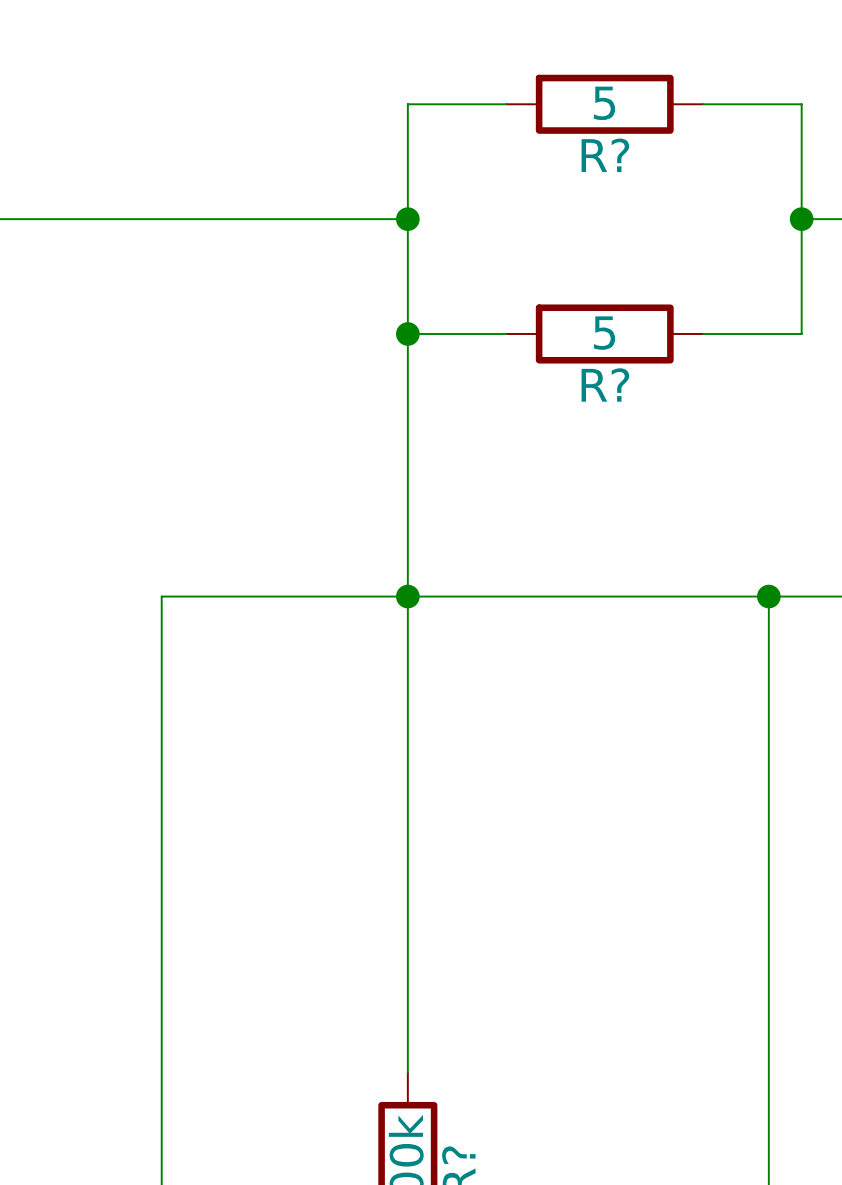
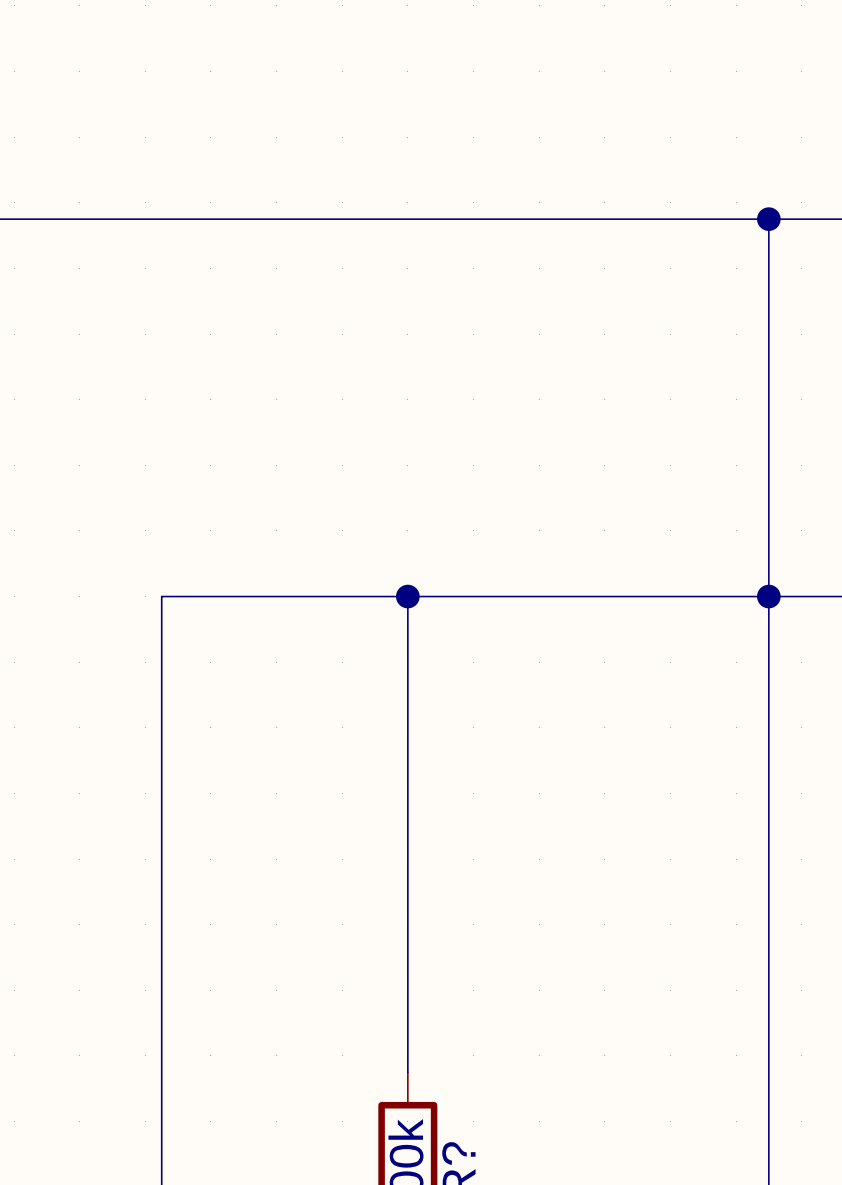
wire: (506, 104) (407, 104) (407, 596) -> none
R?: 5 (604, 104) -> none
wire: (703, 104) (801, 104) (801, 334) (703, 334) -> none
wire: none -> (407, 219) (801, 219)
junction: (407, 219) -> none
wire: none -> (768, 219) (768, 596)
junction position: (801, 219) -> (768, 219)
wire: (407, 334) (506, 334) -> none
junction: (407, 334) -> none
R?: 5 (604, 334) -> none

